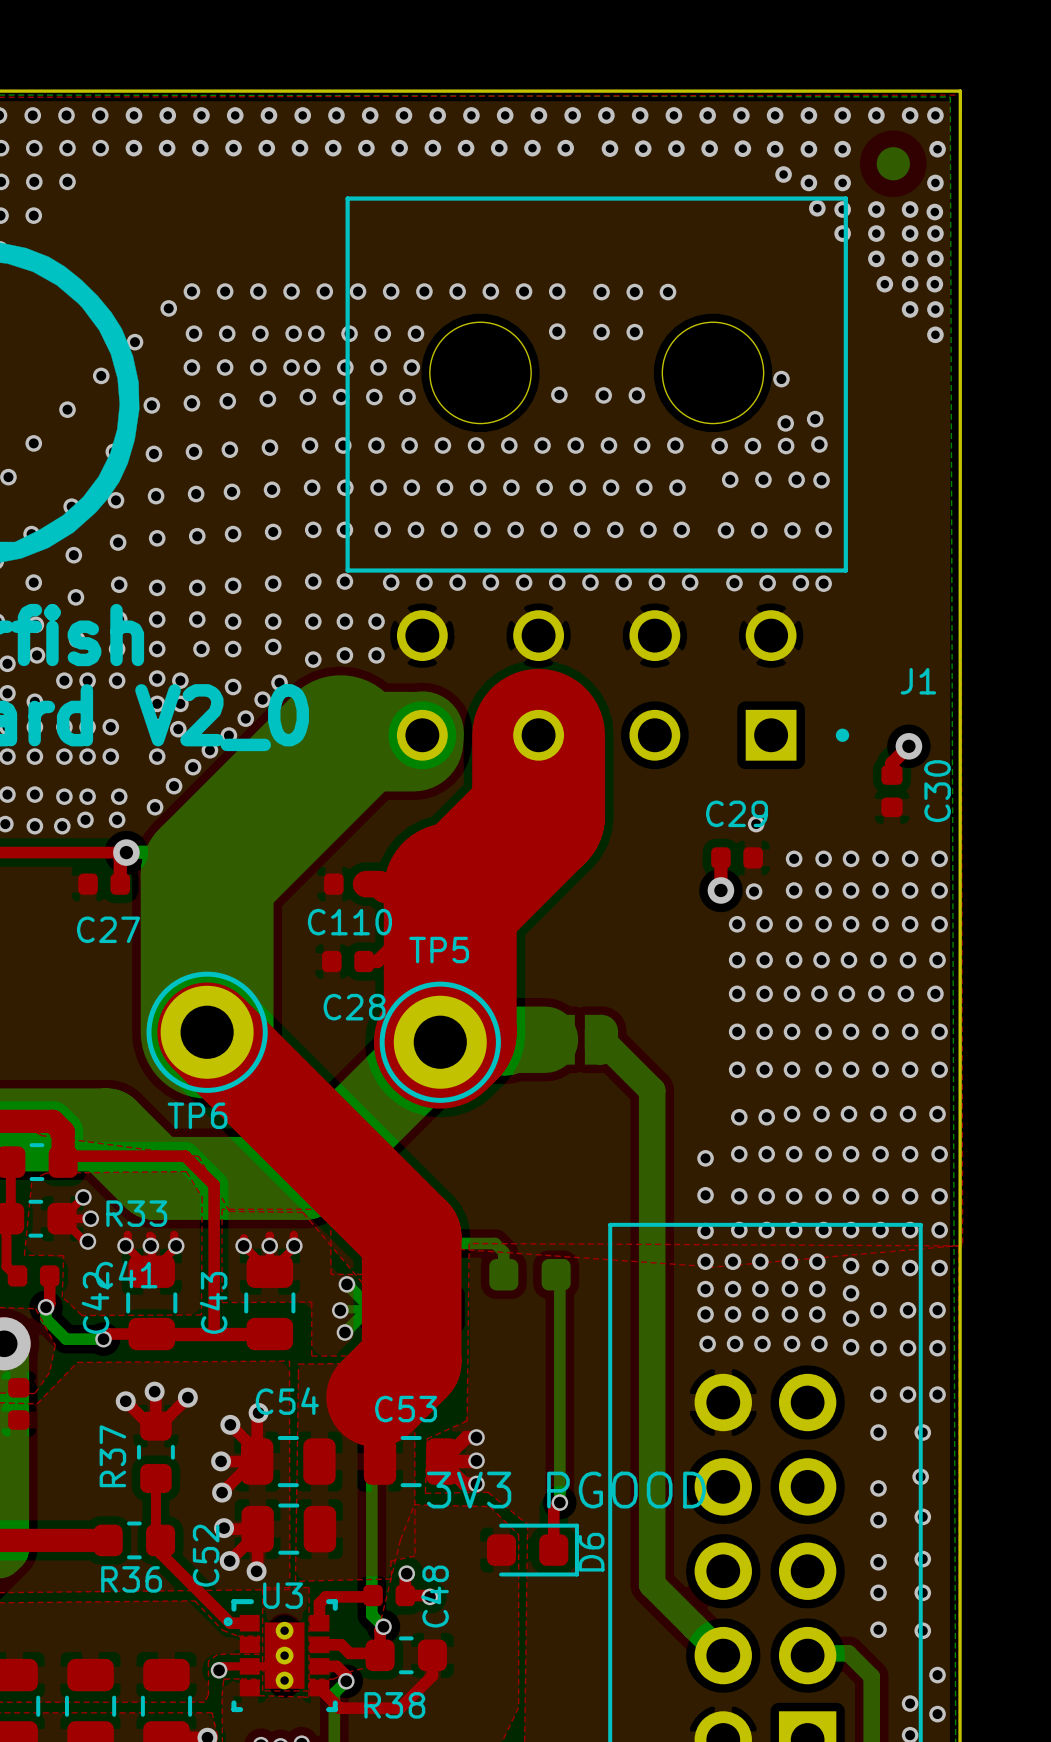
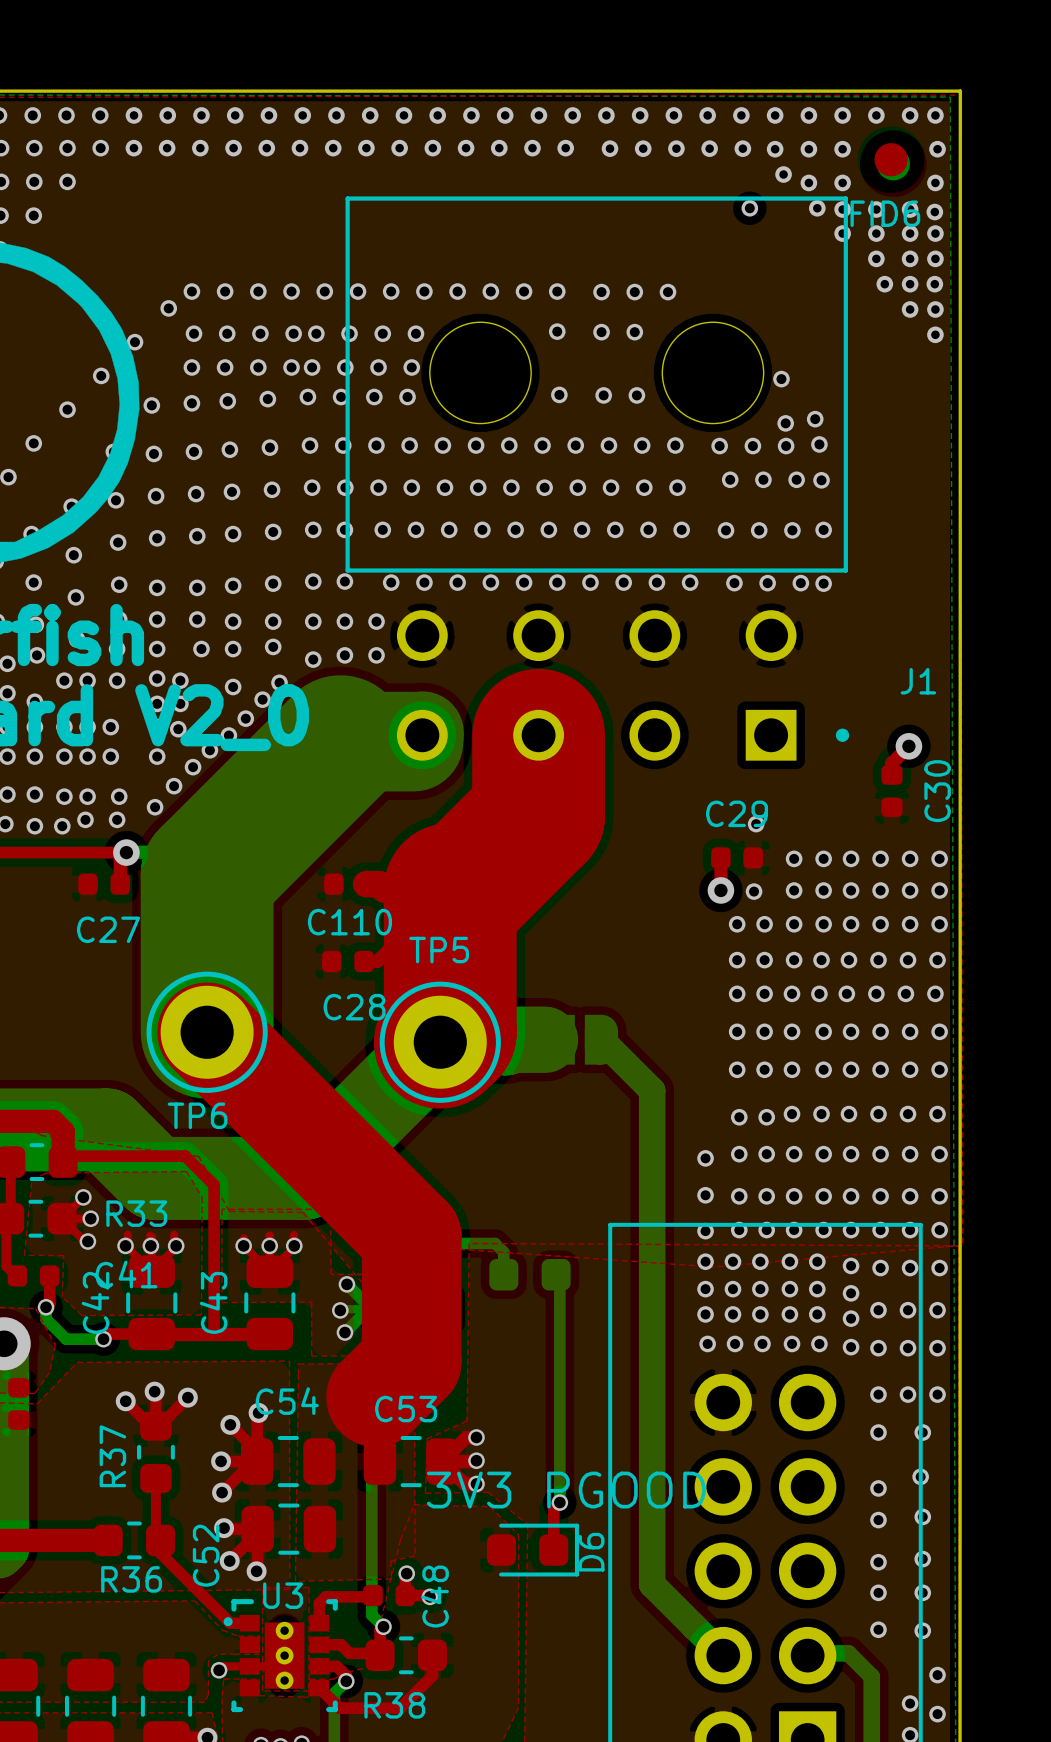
FID6: none -> (891, 159)
via: none -> (749, 208)

